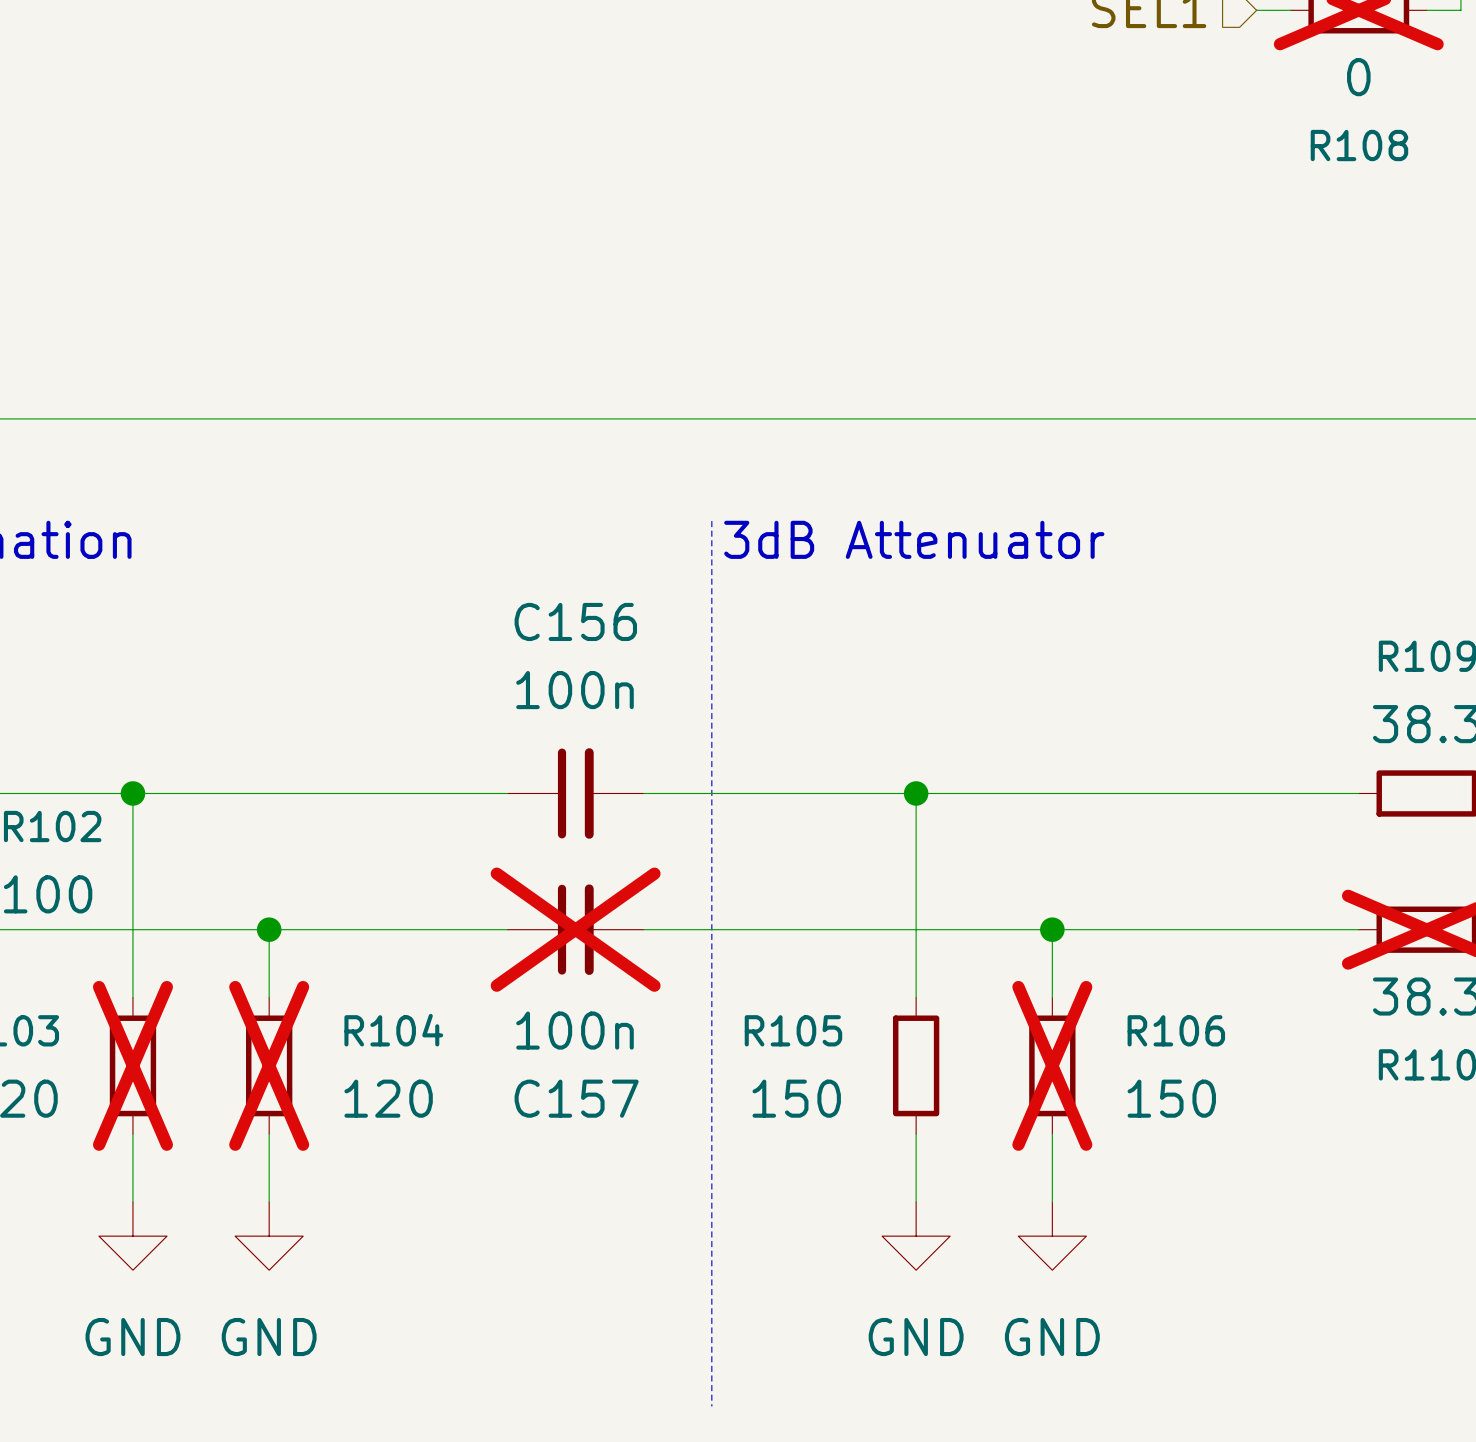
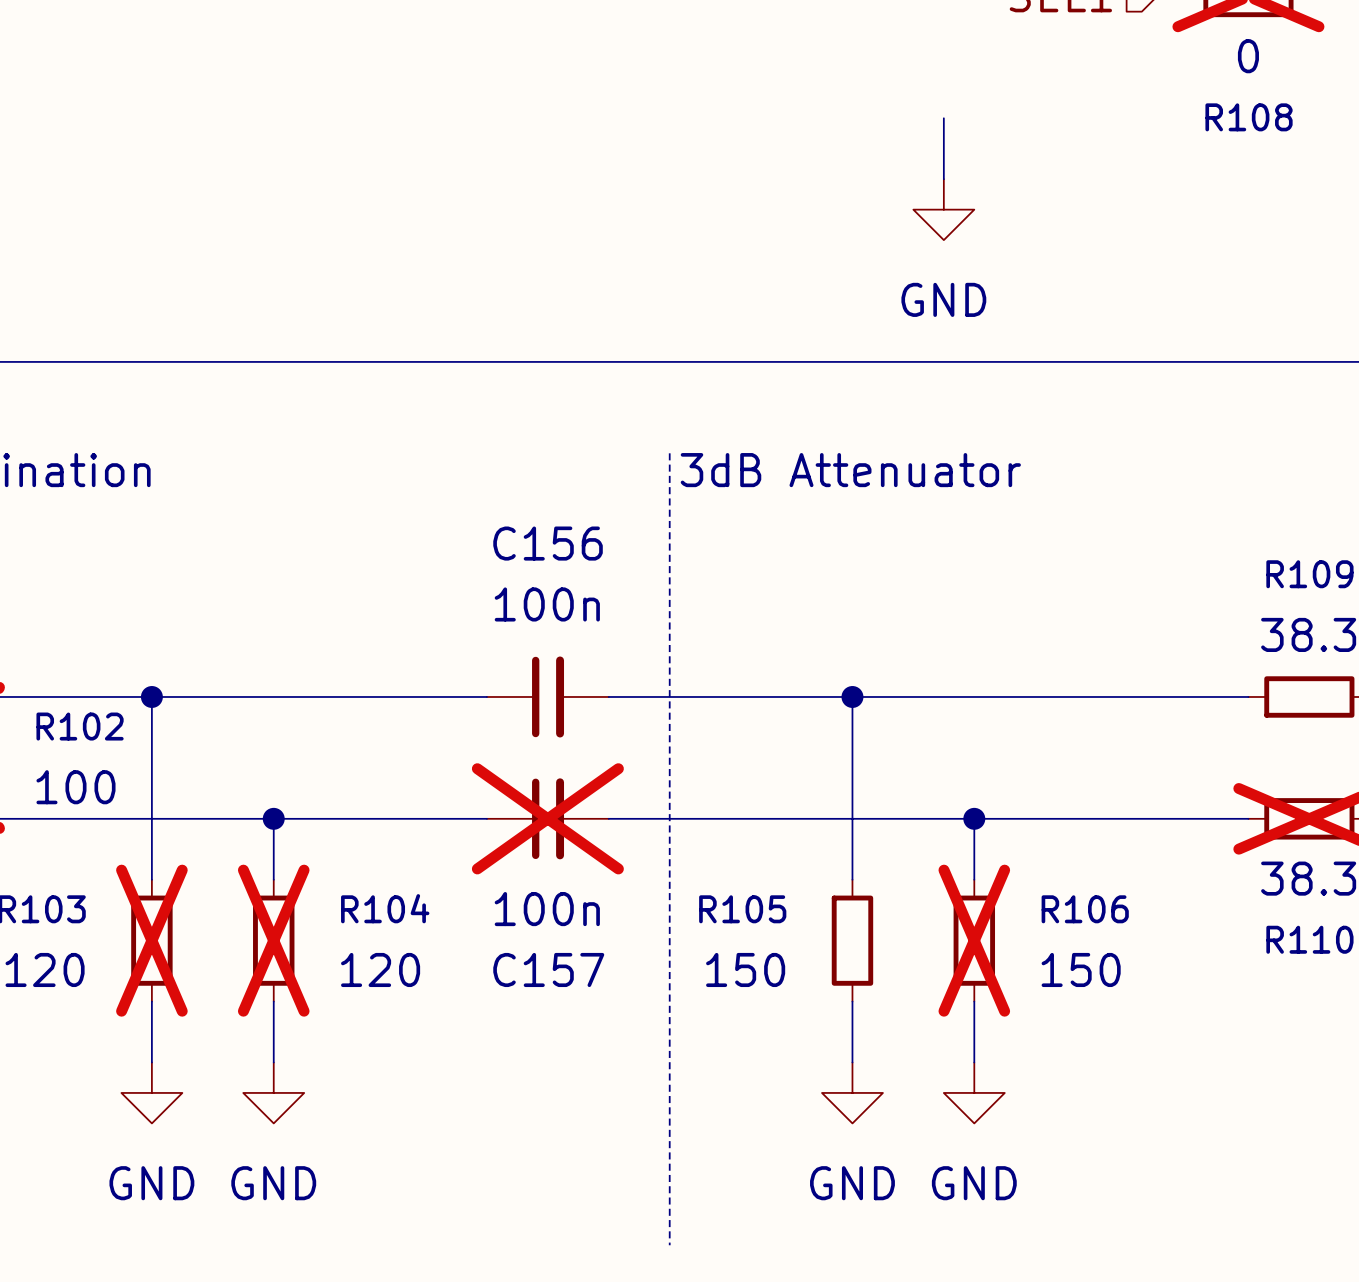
wire: none -> (943, 118) (943, 179)
power symbol: none -> GND (943, 209)

